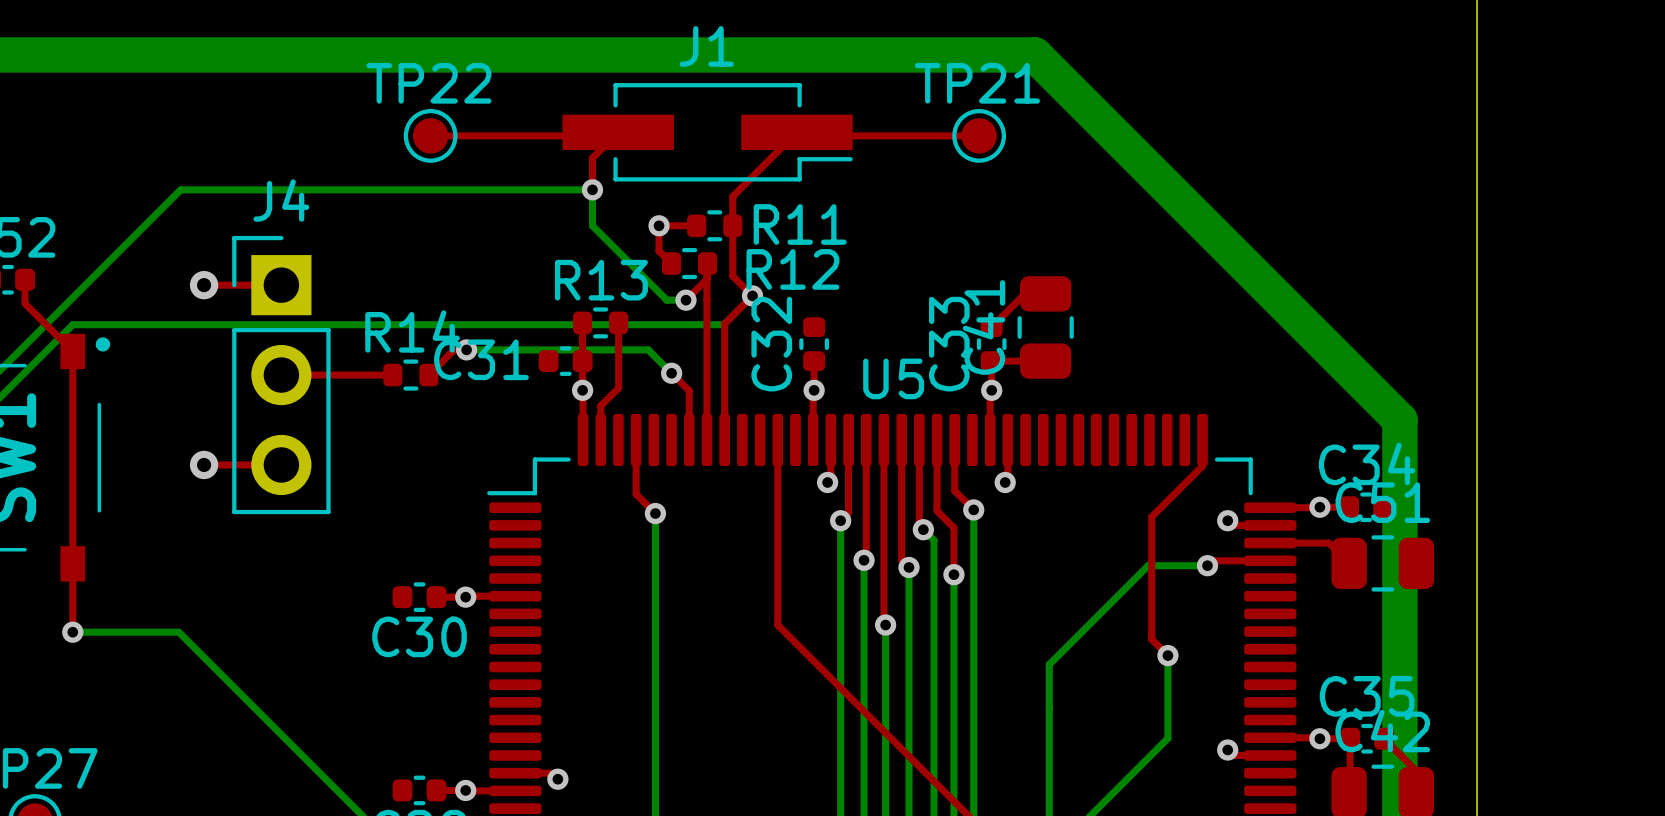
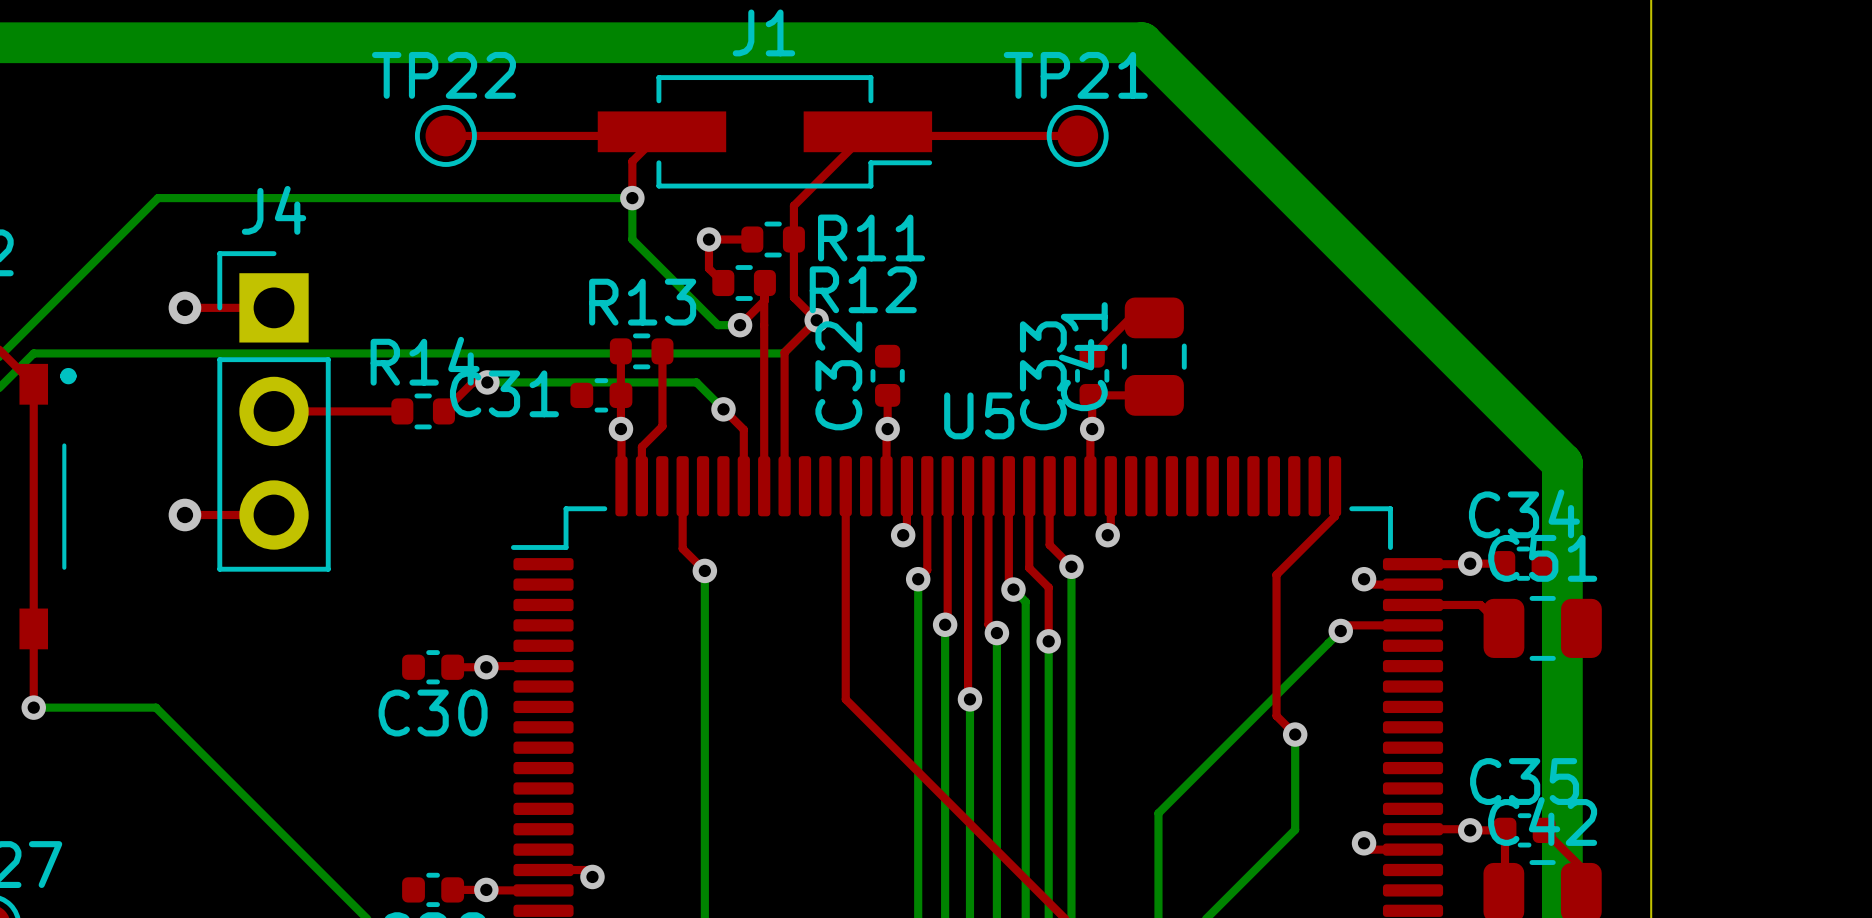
bottom track: (1207, 565) (1148, 565) (1049, 664) (1049, 723) -> (1340, 630) (1158, 813)

